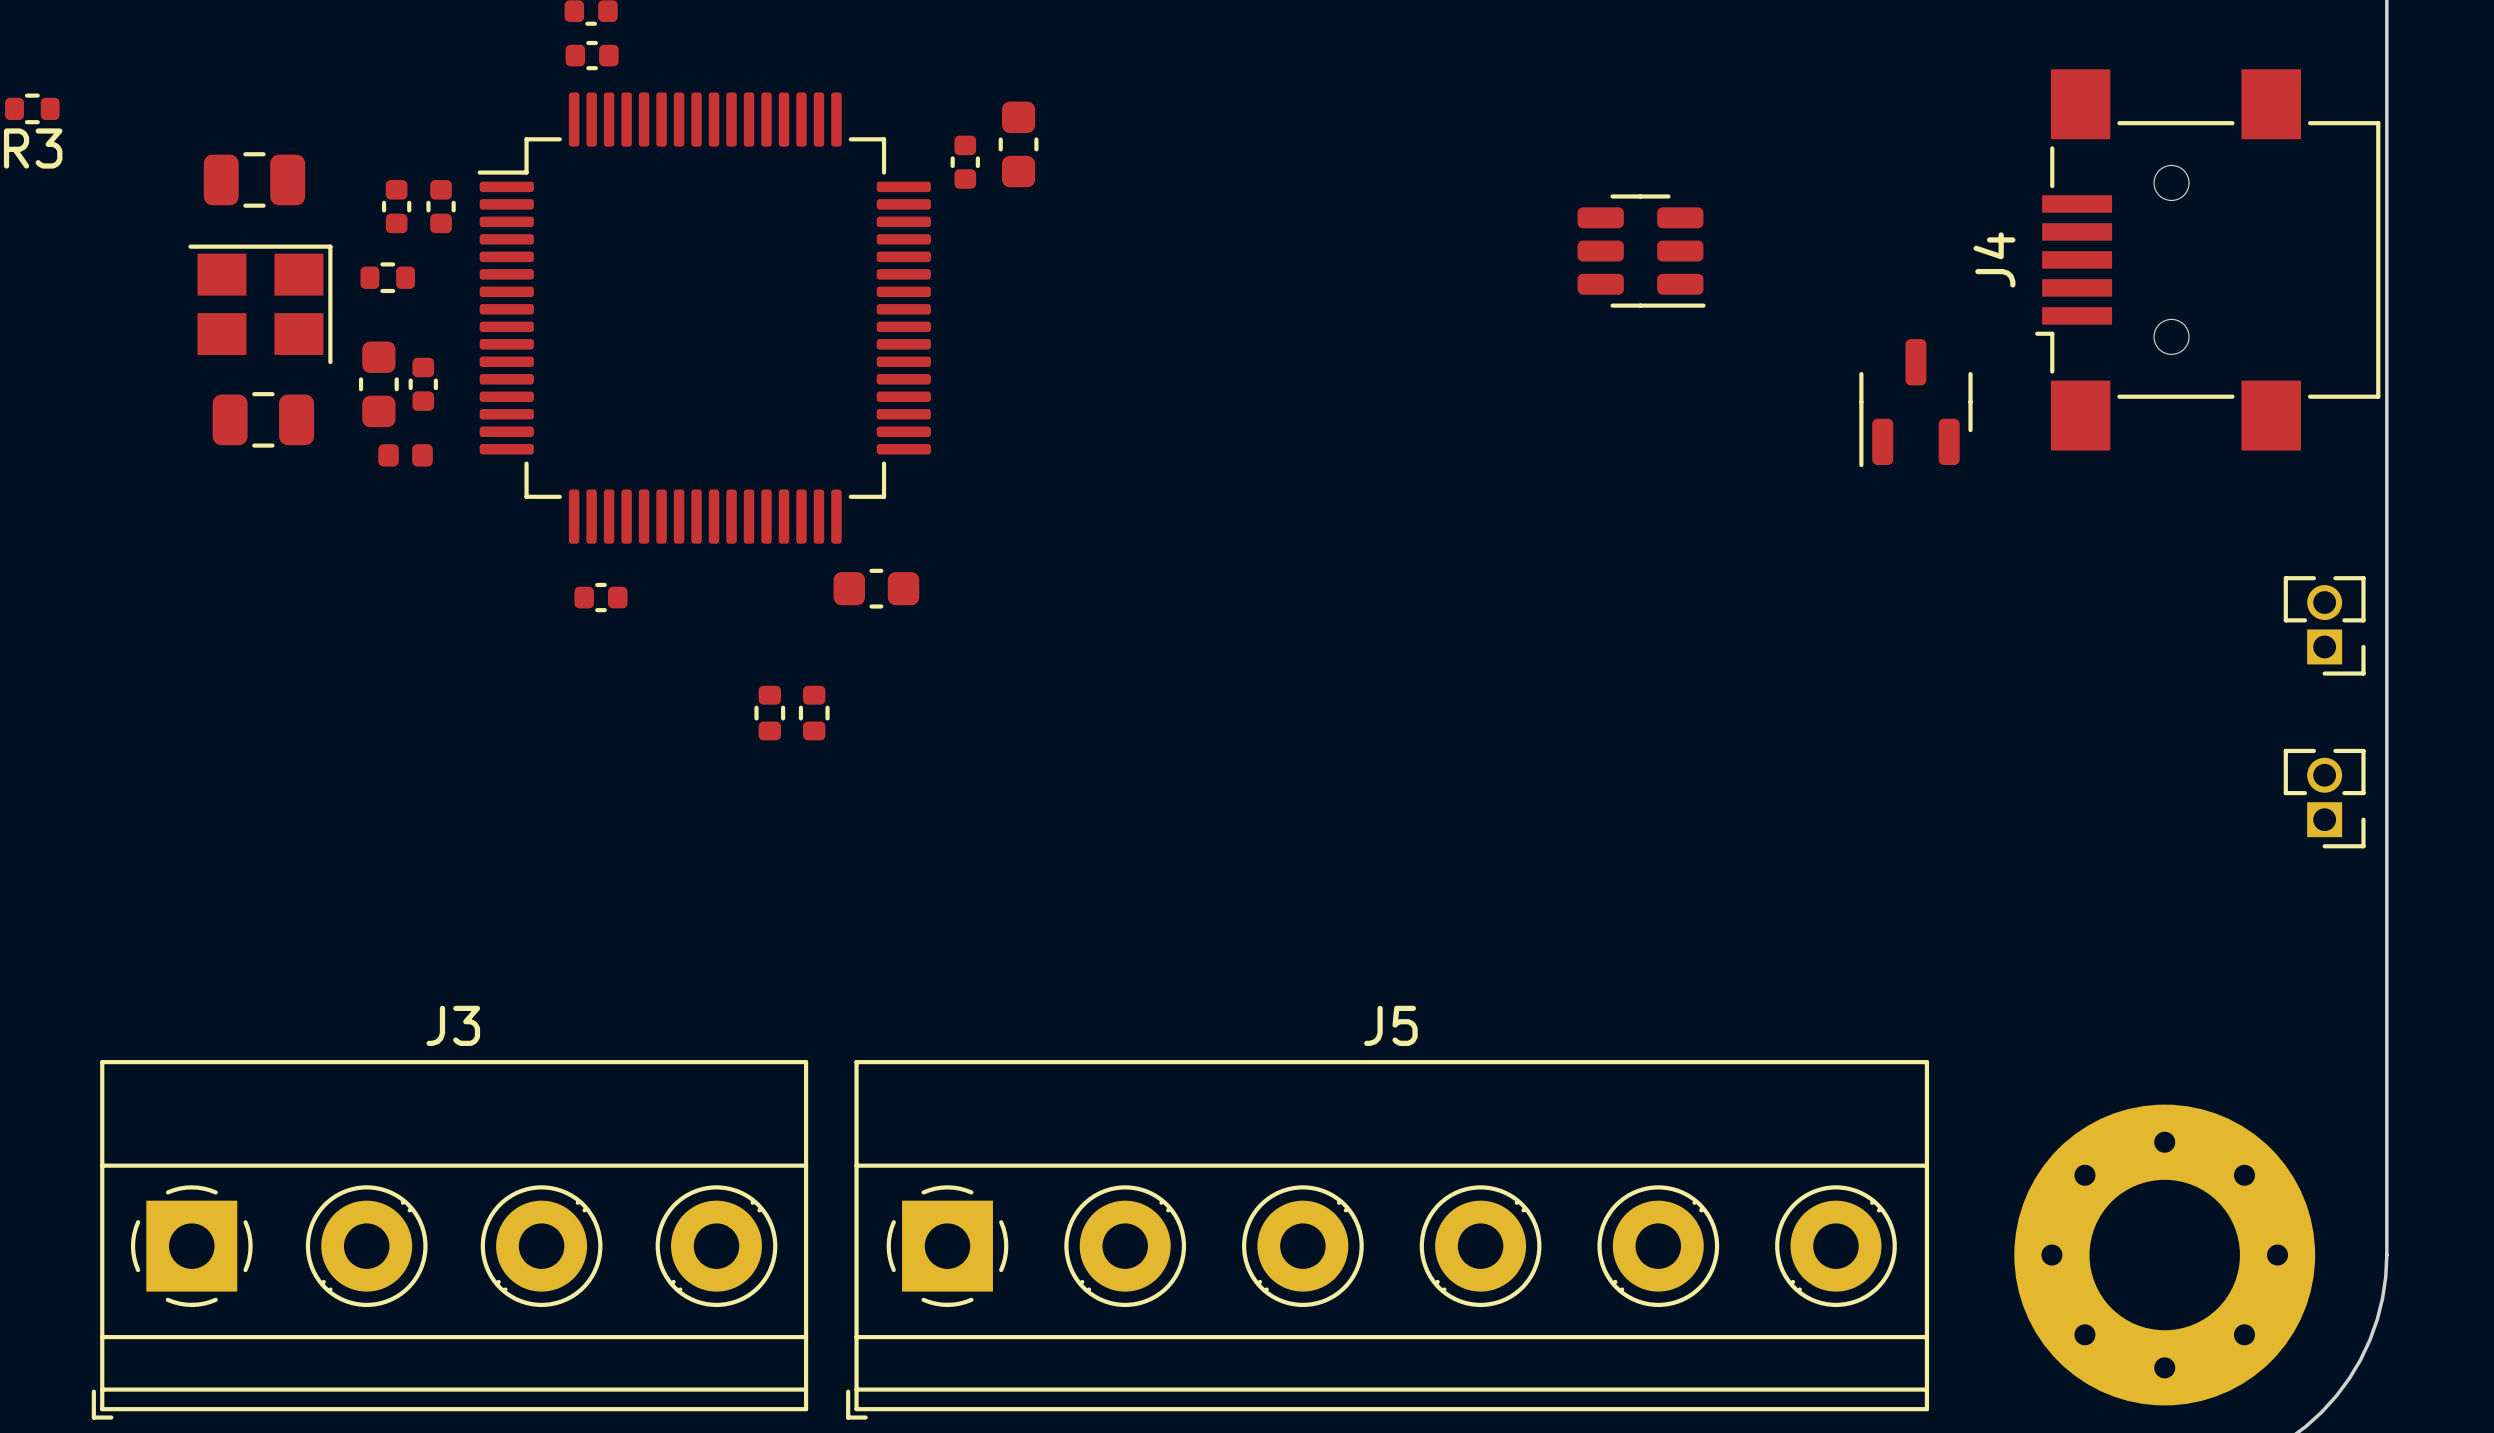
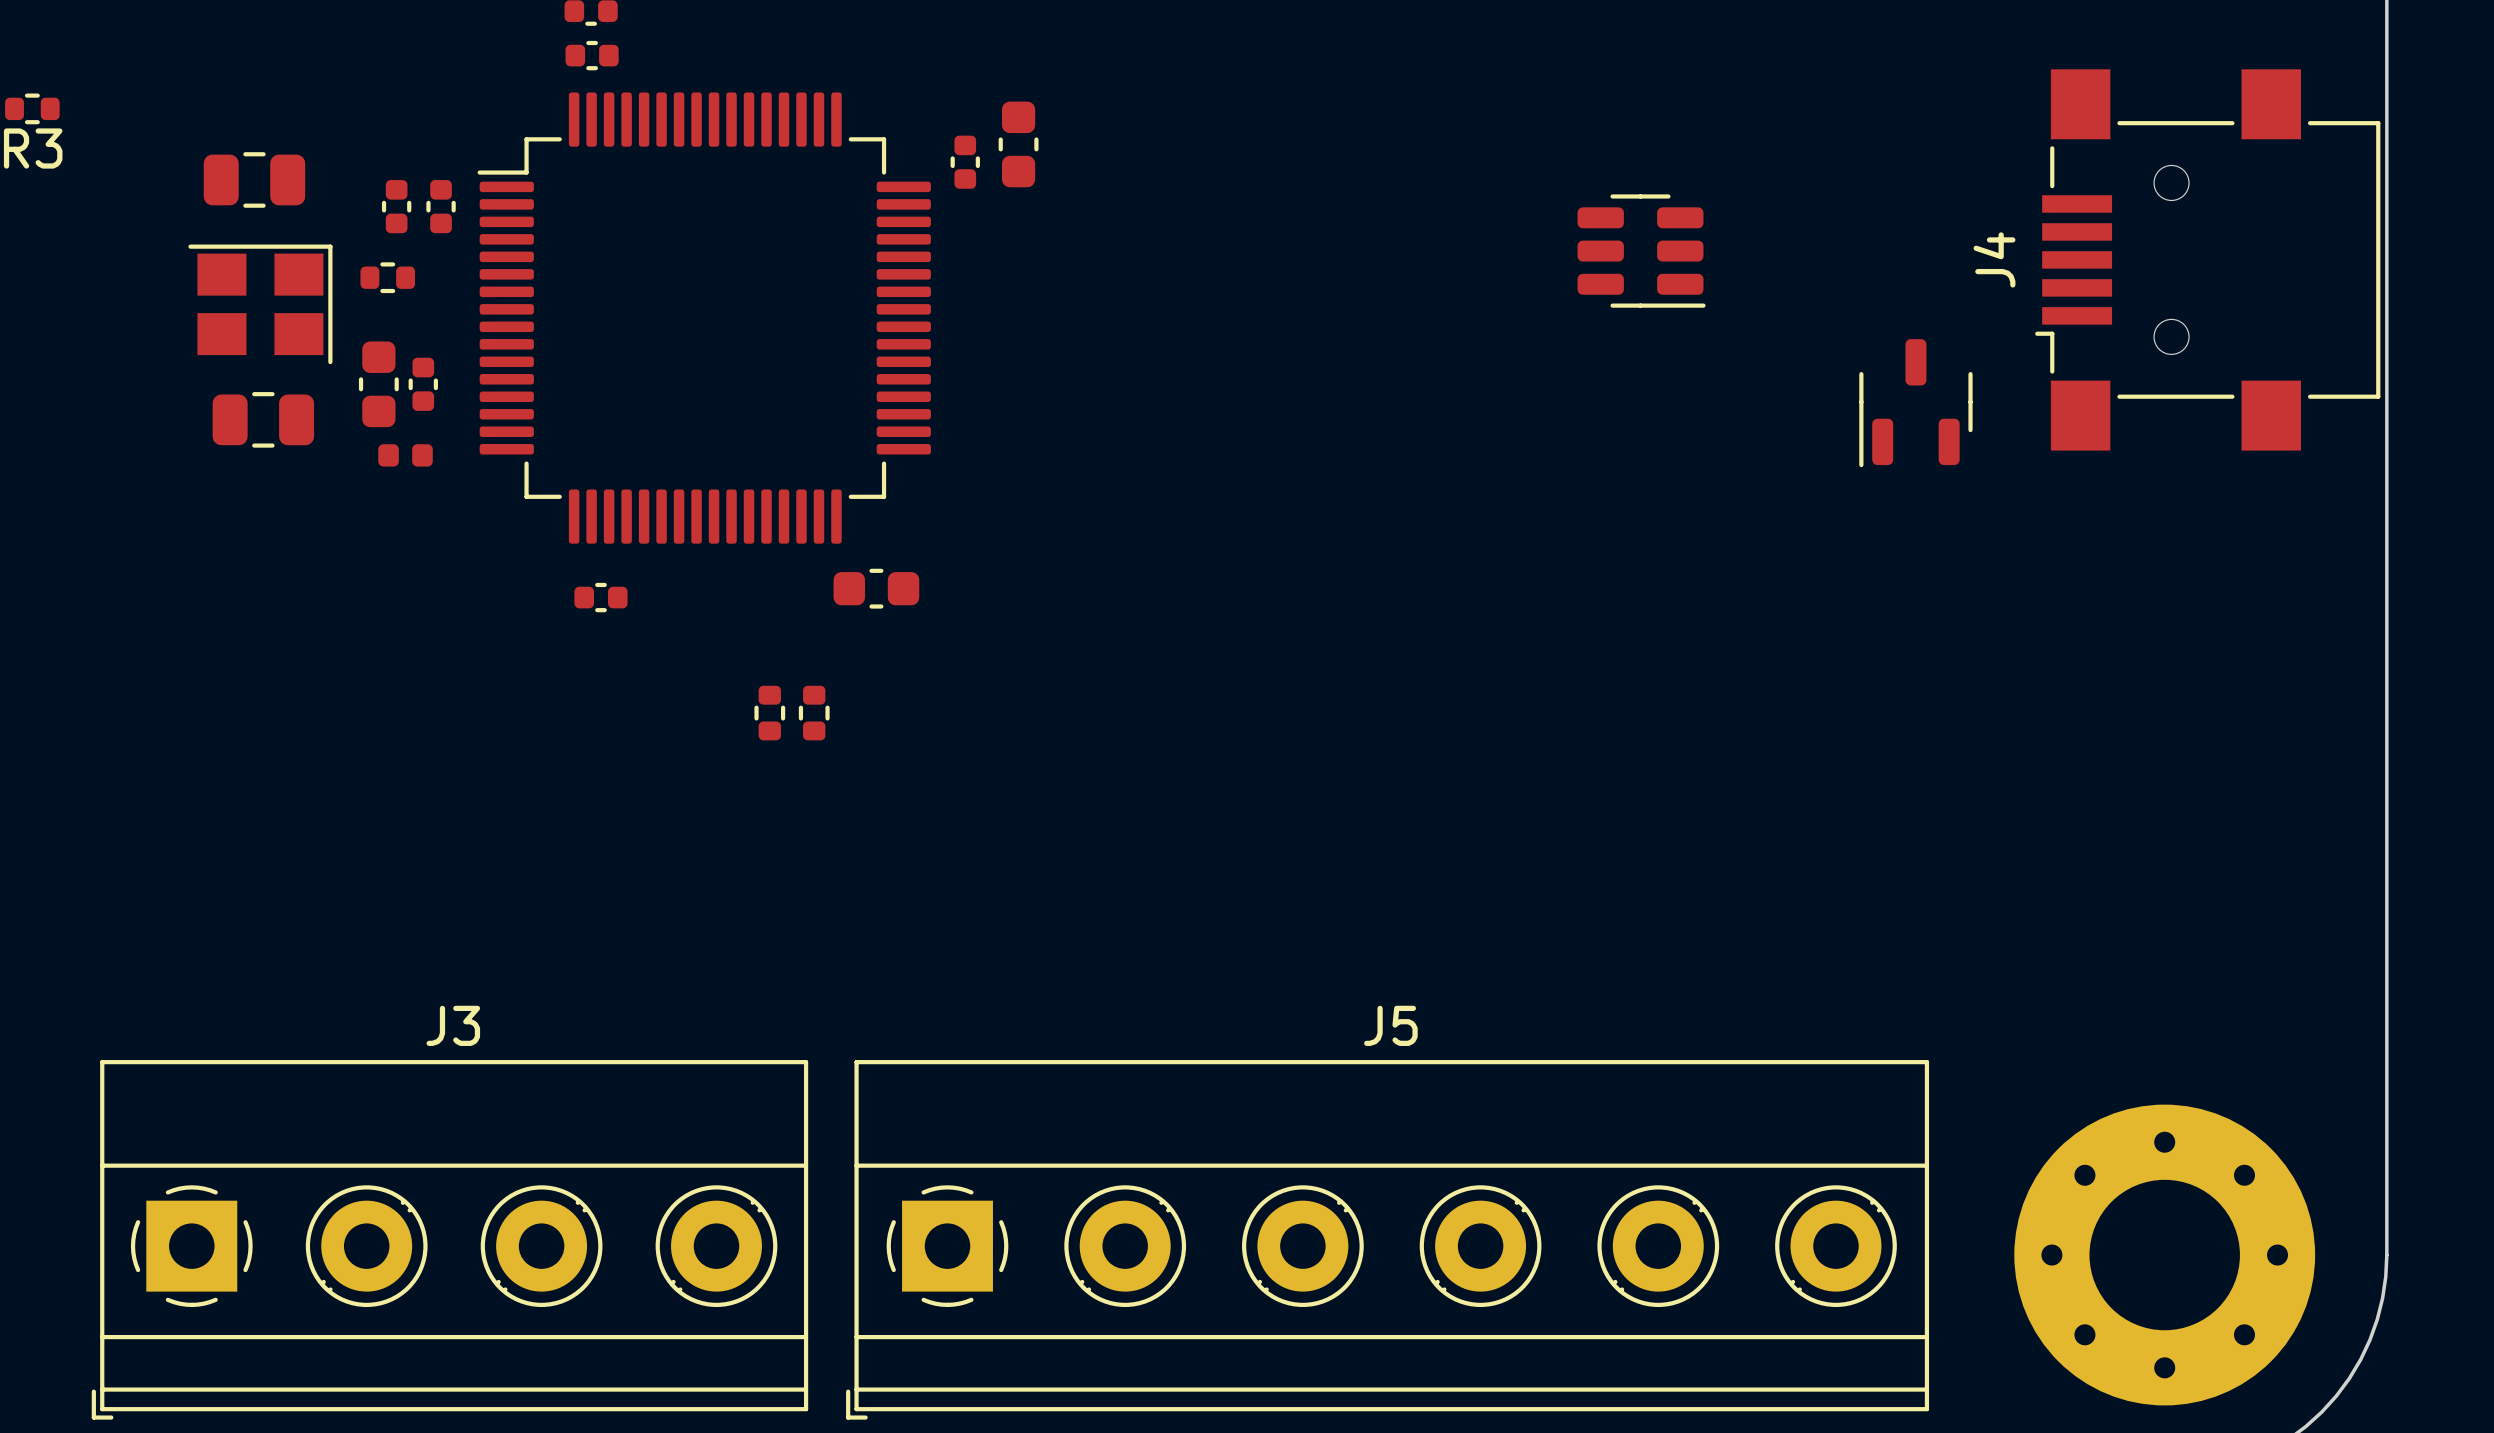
part: (2324, 625) -> none
part: (2324, 798) -> none

